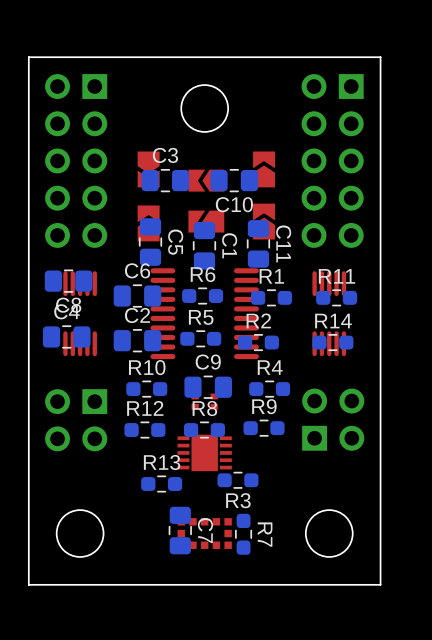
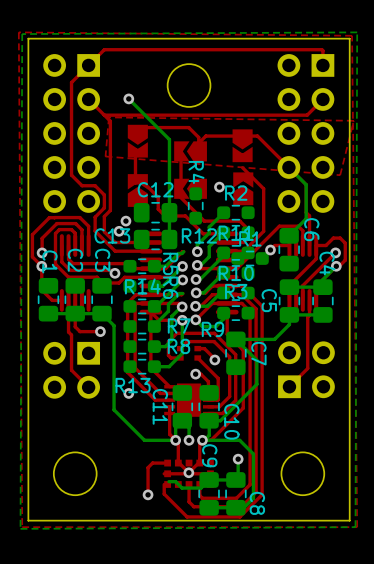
top zone outline: none -> (18, 32) (352, 35) (357, 527) (22, 527) (18, 32)
bottom zone outline: none -> (357, 32) (355, 527) (20, 528) (22, 34) (357, 32)
top track: none -> (322, 65) (321, 49) (104, 49) (71, 82) (71, 175) (82, 185) (95, 185) (104, 194) (104, 207) (95, 217) (95, 231) (115, 251) (150, 251)
top track: none -> (88, 99) (110, 121) (110, 210) (104, 216) (104, 231) (115, 242) (150, 242)
bottom track: none -> (128, 98) (169, 139) (169, 239)
via: none -> (128, 98)
top track: none -> (322, 99) (307, 115) (104, 115)
top zone outline: none -> (108, 117) (105, 156) (340, 175) (353, 120) (108, 117)
top track: none -> (135, 136) (143, 127) (188, 127) (198, 137) (198, 152)
part rotation: 0° (264, 169) -> 180° (242, 145)
top track: none -> (198, 143) (205, 136) (257, 136) (306, 184) (306, 212) (309, 215) (309, 245)
C3 rotation: 0° (165, 180) -> 90° clockwise (102, 299)
C3 position: (165, 180) -> (102, 299)
C10 rotation: 0° (234, 180) -> 90° clockwise (209, 406)
C10 position: (234, 180) -> (209, 406)
top track: none -> (179, 152) (181, 154) (179, 196) (204, 221) (239, 221) (250, 231) (250, 236) (243, 242) (227, 242)
top track: none -> (135, 155) (135, 182) (143, 182) (158, 197) (158, 209) (165, 216) (185, 216) (203, 233) (227, 233)
top track: none -> (242, 167) (263, 188) (263, 231) (243, 251) (227, 251)
bottom track: none -> (288, 167) (306, 184) (306, 218) (289, 235)
via: none -> (219, 187)
C5 position: (150, 242) -> (289, 301)
C5 name position: C5 (175, 242) -> C5 (269, 300)
C11 position: (258, 243) -> (182, 406)
C11 name position: C11 (283, 243) -> C11 (160, 406)
C1 position: (204, 245) -> (48, 299)
C1 name position: C1 (229, 245) -> C1 (49, 261)
C12: none -> (155, 212)
bottom track: none -> (223, 212) (209, 227) (209, 233) (197, 244) (197, 251)
top track: none -> (54, 217) (79, 217) (88, 226) (88, 245)
top track: none -> (54, 217) (49, 217) (32, 234) (32, 256) (41, 266) (41, 289) (52, 300) (61, 300)
via: none -> (125, 221)
via: none -> (119, 231)
bottom track: none -> (223, 232) (209, 246) (209, 256) (200, 265) (197, 265)
R6 name rotation: 0° (203, 274) -> 90° clockwise (170, 287)
R6 name position: R6 (203, 274) -> R6 (170, 287)
C13: none -> (155, 239)
C8 rotation: 0° (68, 281) -> 90° clockwise (235, 493)
C8 position: (68, 281) -> (235, 493)
top track: none -> (61, 245) (61, 262) (70, 270) (112, 270) (114, 273)
top track: none -> (68, 245) (68, 259) (73, 263) (131, 263) (136, 268) (165, 268) (183, 251)
top track: none -> (75, 245) (75, 233) (71, 229) (59, 229) (55, 233) (55, 264) (68, 277) (97, 277) (102, 283) (118, 283) (124, 277) (171, 277) (182, 266)
top track: none -> (81, 245) (81, 229) (75, 223) (56, 223) (42, 238) (42, 252)
top track: none -> (289, 245) (274, 245) (270, 250)
top track: none -> (302, 245) (302, 230) (298, 226) (279, 226) (236, 268) (200, 268) (197, 265)
via: none -> (270, 250)
bottom track: none -> (183, 251) (178, 253) (165, 266) (154, 266)
via: none -> (197, 251)
via: none -> (42, 252)
bottom track: none -> (223, 252) (223, 255) (199, 279) (196, 279)
top track: none -> (335, 252) (302, 285) (302, 300)
via: none -> (335, 252)
C6 rotation: 0° (137, 296) -> 90° clockwise (289, 249)
C6 position: (137, 296) -> (289, 249)
R6 position: (202, 296) -> (142, 286)
R11 position: (336, 297) -> (235, 252)
via: none -> (197, 265)
via: none -> (41, 266)
bottom track: none -> (182, 266) (162, 286) (154, 286)
via: none -> (182, 266)
bottom track: none -> (336, 266) (322, 279) (322, 287) (289, 287)
via: none -> (336, 266)
bottom track: none -> (223, 272) (203, 292) (196, 292)
via: none -> (114, 273)
R5 name rotation: 0° (201, 317) -> 90° clockwise (170, 263)
via: none -> (196, 279)
bottom track: none -> (182, 279) (154, 306)
via: none -> (182, 279)
top track: none -> (196, 292) (205, 292) (212, 286) (241, 286) (262, 306) (262, 494) (239, 516) (187, 516) (164, 494) (164, 484)
via: none -> (196, 292)
bottom track: none -> (223, 293) (220, 293) (207, 306) (195, 306)
C4 rotation: 0° (66, 336) -> 90° clockwise (322, 301)
C4 position: (66, 336) -> (322, 301)
top track: none -> (182, 293) (136, 294) (127, 303) (127, 372) (155, 400) (169, 400)
bottom track: none -> (182, 293) (179, 293) (168, 304) (168, 311) (154, 326)
R5 position: (200, 338) -> (142, 266)
C2 rotation: 0° (137, 340) -> 90° clockwise (75, 299)
C2 position: (137, 340) -> (75, 299)
R2 position: (258, 342) -> (235, 212)
R14 position: (332, 342) -> (142, 306)
top track: none -> (68, 300) (68, 332) (71, 335) (71, 370) (88, 387)
top track: none -> (75, 300) (75, 326) (80, 331) (100, 331)
top track: none -> (309, 300) (307, 368) (289, 386)
top track: none -> (316, 300) (316, 286) (345, 260) (345, 243) (340, 238) (333, 238) (325, 245) (316, 245) (316, 258) (289, 285) (289, 300)
top track: none -> (182, 306) (178, 303) (135, 304) (135, 368) (160, 393) (169, 393)
bottom track: none -> (182, 306) (171, 316) (171, 340) (165, 346) (154, 346)
via: none -> (182, 306)
top track: none -> (195, 306) (200, 306) (212, 294) (241, 294) (256, 308) (256, 492) (241, 506) (193, 506) (189, 501) (189, 487)
via: none -> (195, 306)
top track: none -> (227, 312) (227, 334) (243, 350) (243, 408) (211, 440) (202, 440) (199, 442) (199, 461) (187, 473) (164, 473)
bottom track: none -> (223, 313) (223, 318) (216, 326) (202, 326) (195, 319)
bottom track: none -> (48, 313) (102, 313) (114, 325) (114, 409) (144, 440) (175, 440) (175, 427) (182, 420) (189, 427) (189, 440)
bottom track: none -> (322, 314) (289, 314) (289, 324) (274, 339) (235, 339) (256, 360) (256, 384) (220, 420) (209, 420)
top track: none -> (195, 319) (212, 303) (241, 303) (250, 311) (250, 484) (236, 498) (202, 498) (199, 495) (199, 487)
via: none -> (195, 319)
top track: none -> (182, 320) (159, 320) (150, 312) (150, 367) (169, 386)
bottom track: none -> (182, 320) (182, 353) (169, 366) (154, 366)
via: none -> (182, 320)
via: none -> (100, 331)
C9 rotation: 0° (208, 387) -> 90° clockwise (209, 493)
C9 position: (208, 387) -> (209, 493)
R10 position: (146, 389) -> (235, 293)
R4 rotation: 0° (269, 389) -> 90° clockwise (195, 206)
R4 position: (269, 389) -> (195, 206)
top track: none -> (180, 348) (187, 341) (214, 341) (229, 357) (229, 396) (219, 406) (208, 406)
top track: none -> (197, 348) (204, 348) (214, 359)
top track: none -> (180, 357) (170, 357) (168, 355) (168, 341) (176, 333) (214, 333) (235, 354) (235, 400) (222, 413) (208, 413)
top track: none -> (197, 357) (218, 378) (218, 399) (208, 400)
R9 name position: R9 (264, 406) -> R9 (212, 329)
R12 name position: R12 (145, 408) -> R12 (199, 235)
R8 name position: R8 (204, 408) -> R8 (178, 346)
via: none -> (214, 359)
top track: none -> (195, 374) (200, 374) (208, 381) (208, 393)
via: none -> (195, 374)
R9 position: (264, 428) -> (235, 313)
R12 position: (144, 430) -> (235, 232)
R8 position: (204, 430) -> (142, 346)
via: none -> (128, 393)
top track: none -> (169, 406) (169, 434) (178, 442) (178, 462) (189, 473) (213, 473)
R13 name position: R13 (162, 462) -> R13 (133, 385)
bottom track: none -> (209, 420) (209, 435) (204, 440)
R3 position: (237, 480) -> (235, 272)
R13 position: (161, 484) -> (142, 366)
via: none -> (175, 440)
via: none -> (189, 440)
bottom track: none -> (202, 440) (239, 440) (253, 454) (253, 498) (243, 507) (209, 507)
via: none -> (202, 440)
bottom track: none -> (238, 459) (238, 477) (235, 479) (209, 479) (201, 488) (182, 488) (175, 481) (168, 481)
via: none -> (238, 459)
top track: none -> (164, 463) (152, 463) (148, 467) (148, 494)
C7 position: (180, 530) -> (235, 353)
via: none -> (188, 472)
R7 rotation: 0° (243, 534) -> 90° clockwise (142, 326)
R7 position: (243, 534) -> (142, 326)
via: none -> (148, 494)

